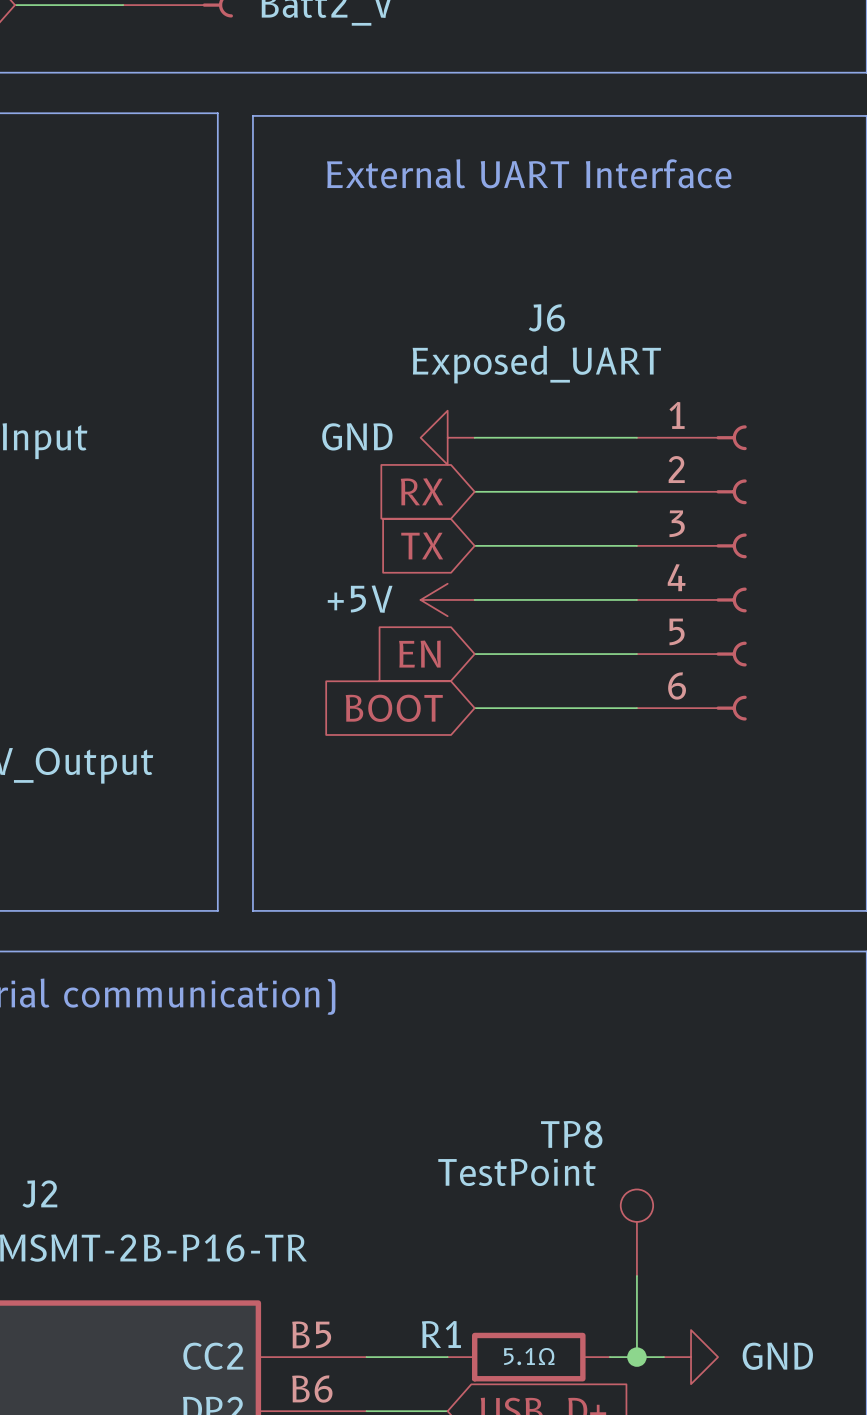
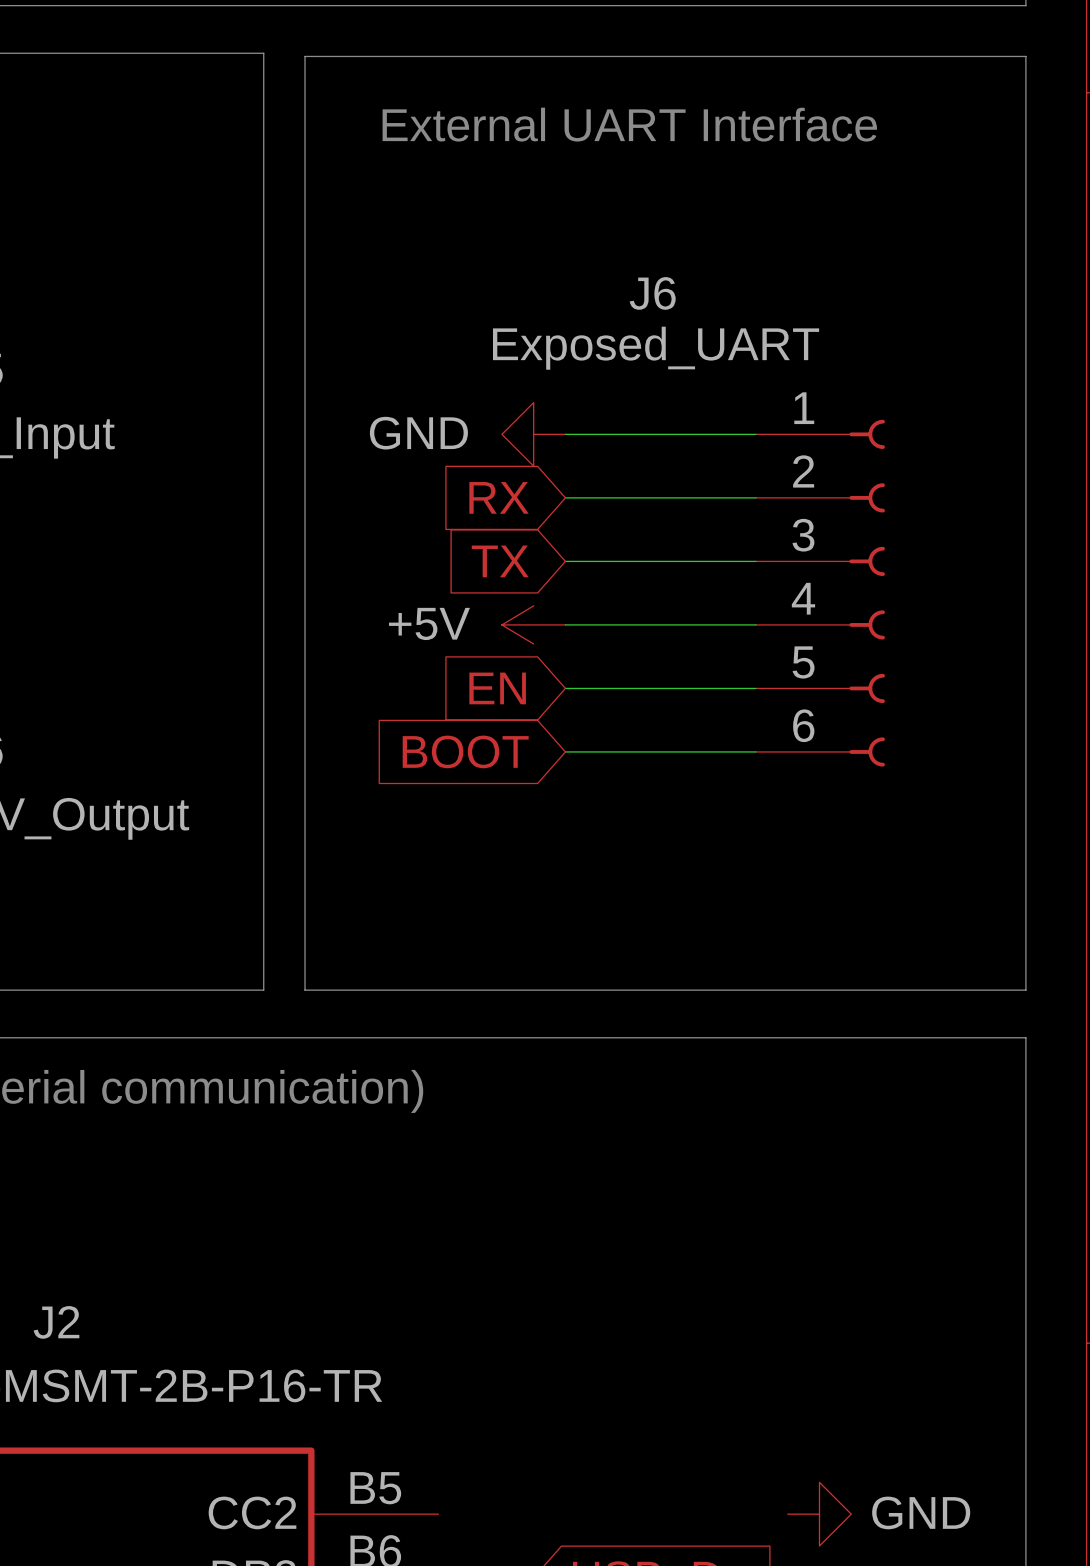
TP8: TestPoint (636, 1232) -> none
wire: (636, 1275) (636, 1357) -> none
wire: (366, 1357) (447, 1357) -> none
R1: 5.1Ω (528, 1357) -> none
wire: (609, 1357) (663, 1357) -> none
junction: (636, 1357) -> none

